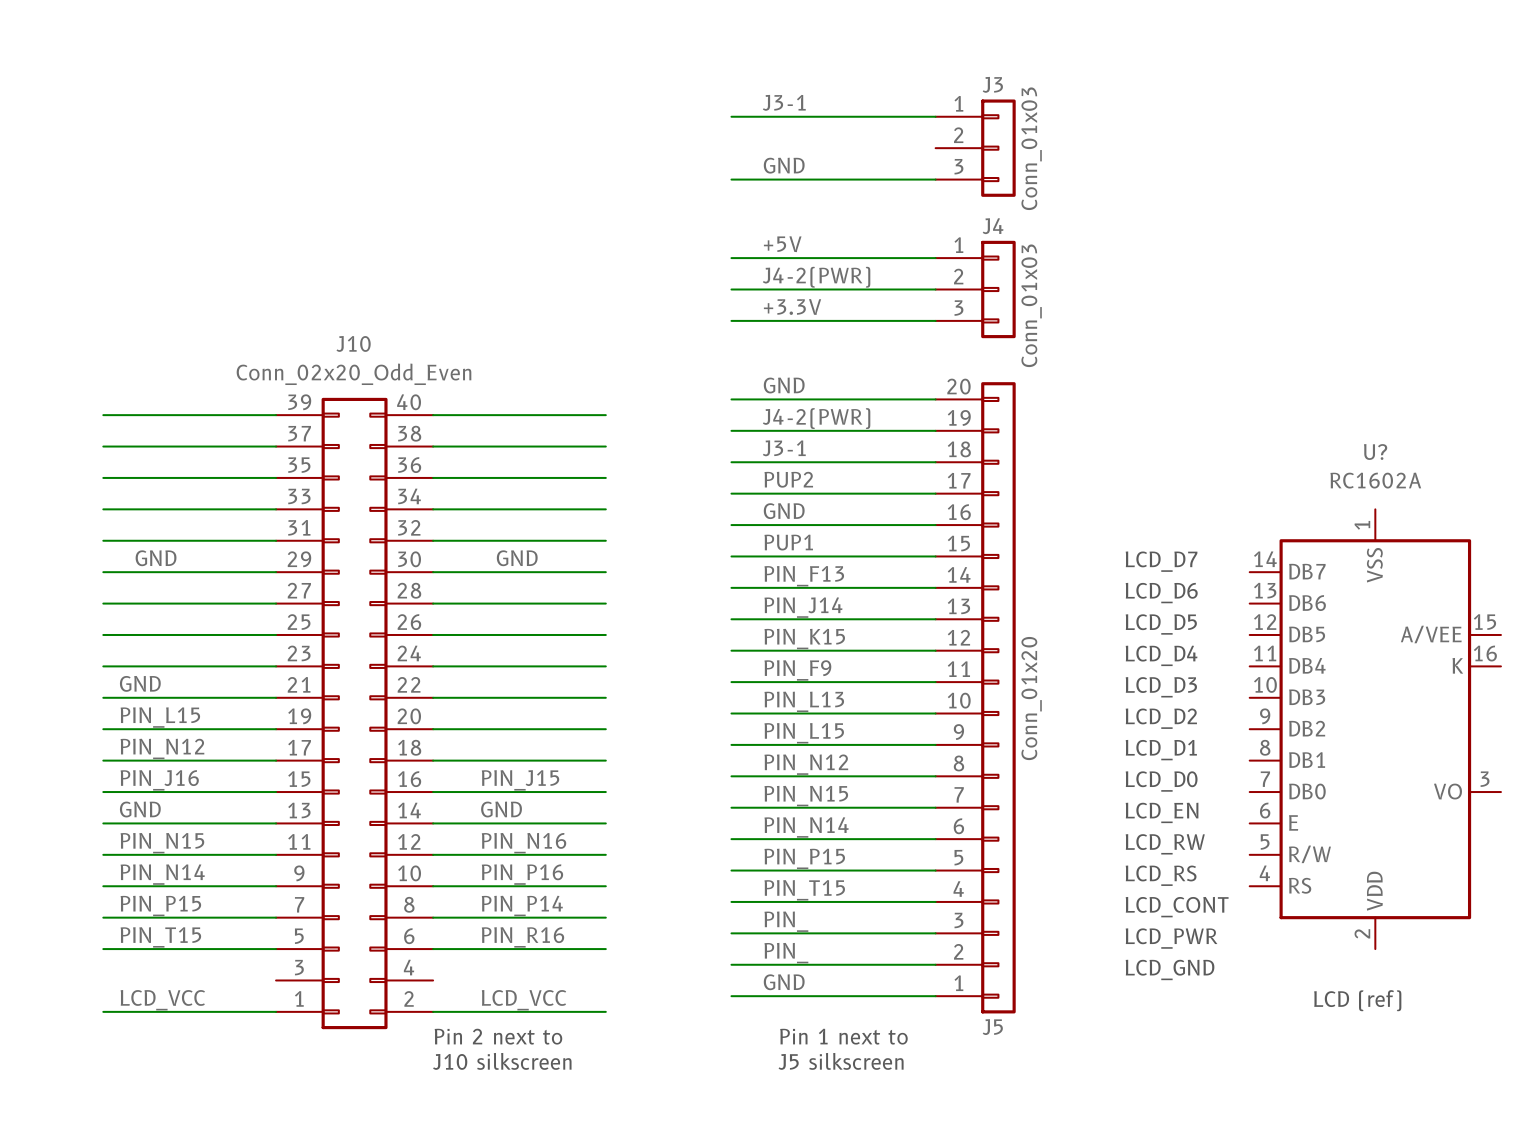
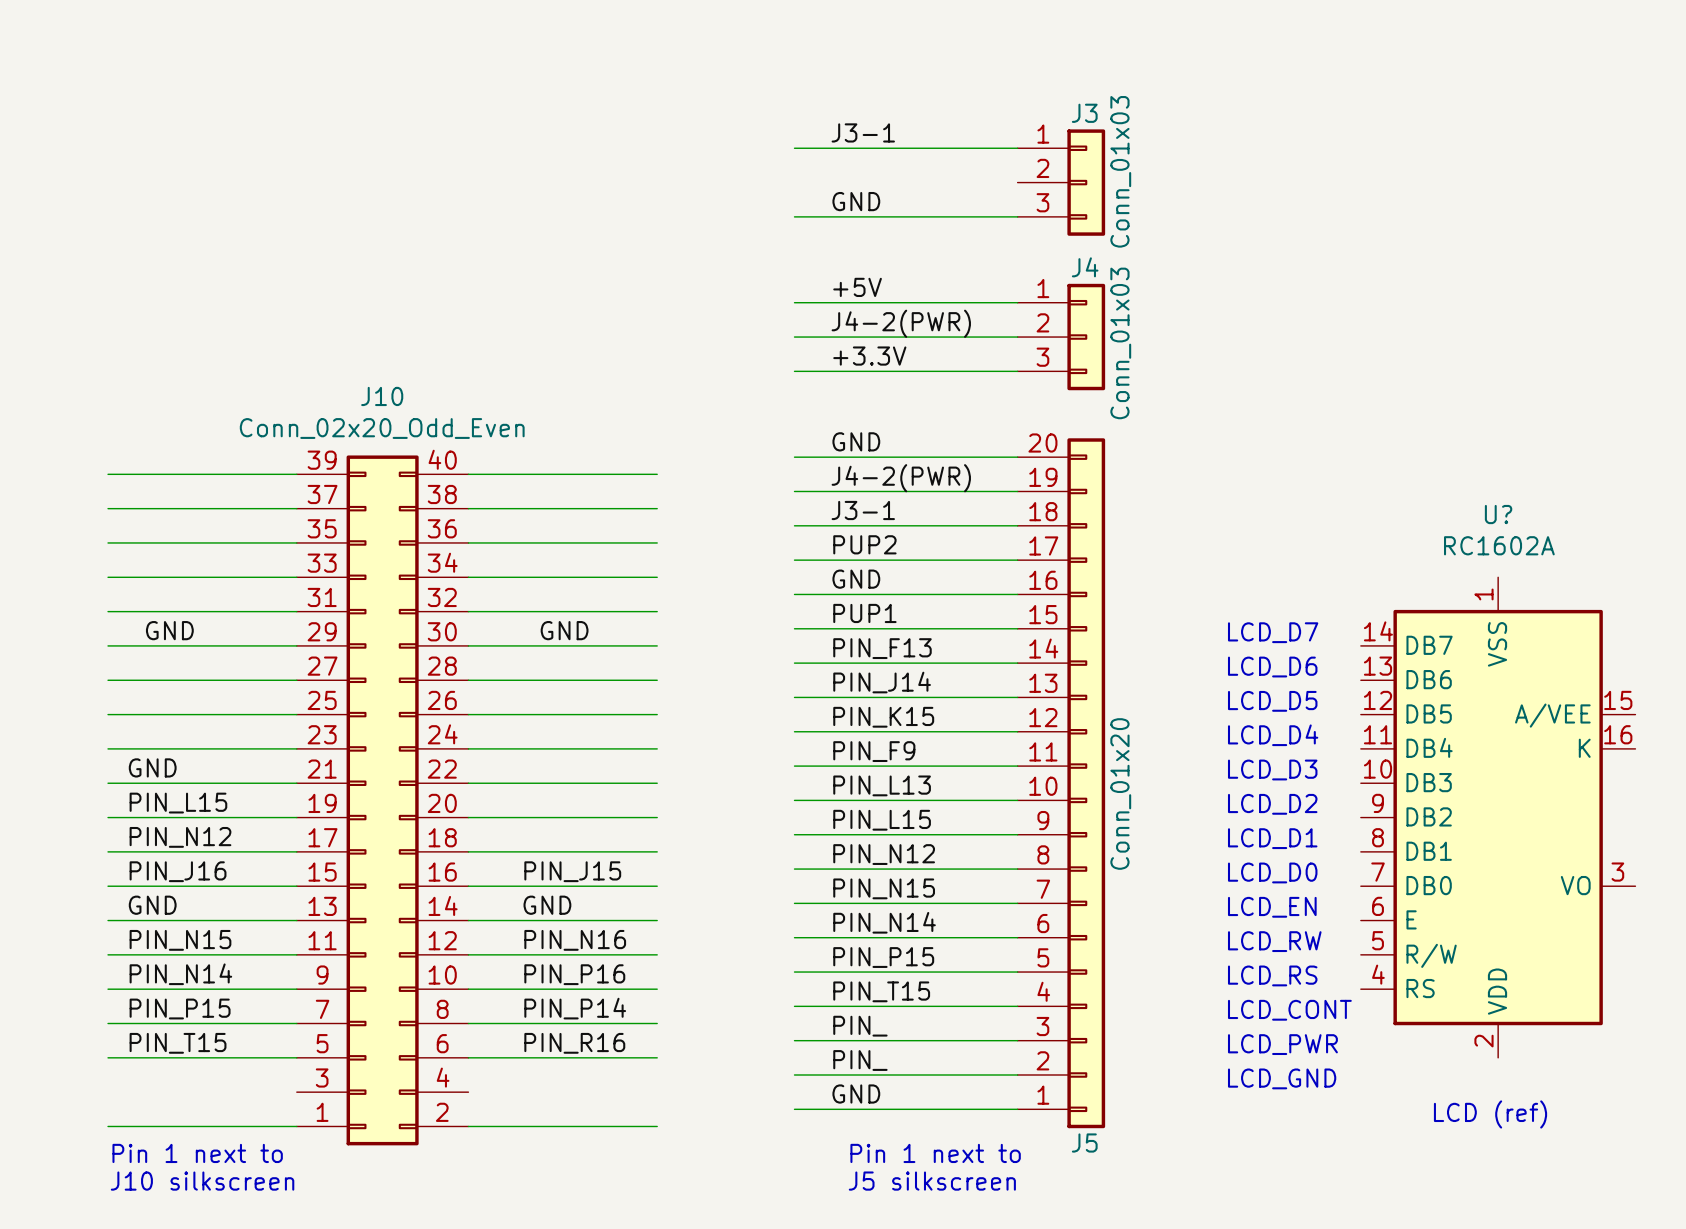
label: LCD_VCC (162, 1000) -> none
label: LCD_VCC (524, 1000) -> none
text: none -> Pin 1 next to (197, 1153)
text: Pin 2 next to (498, 1036) -> none
text: none -> J10 silkscreen (202, 1181)
text: J10 silkscreen (502, 1061) -> none

